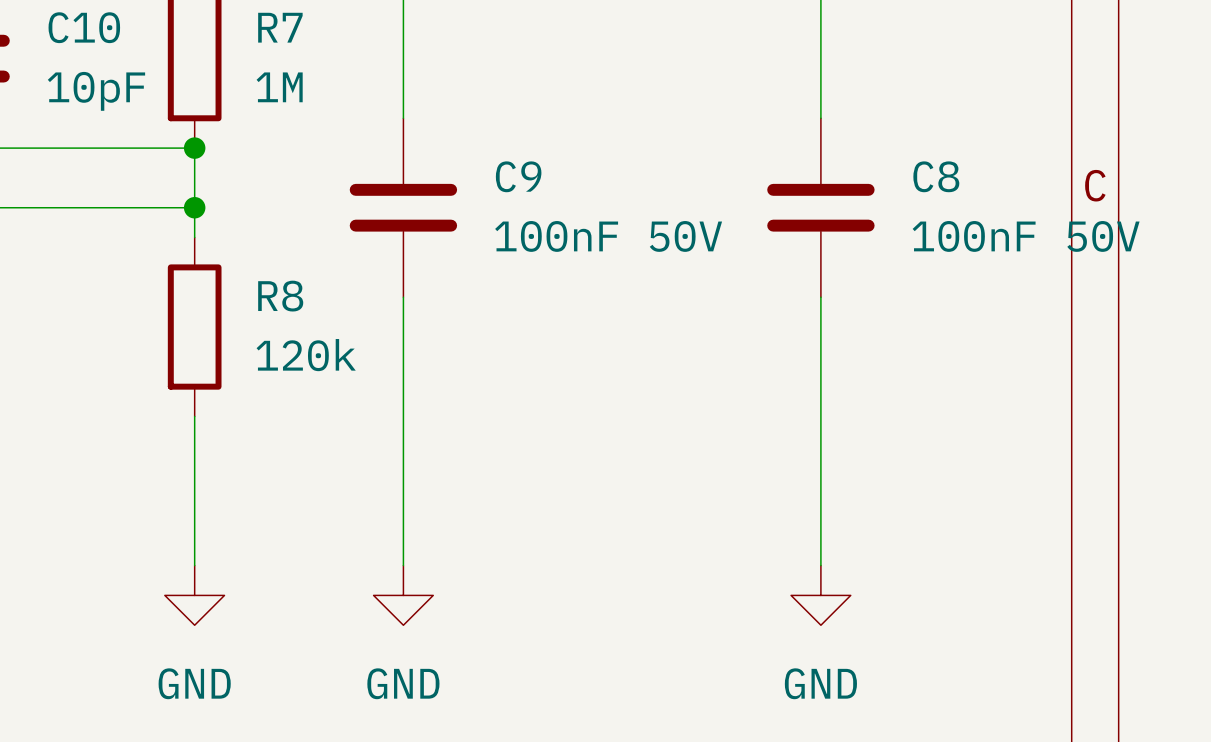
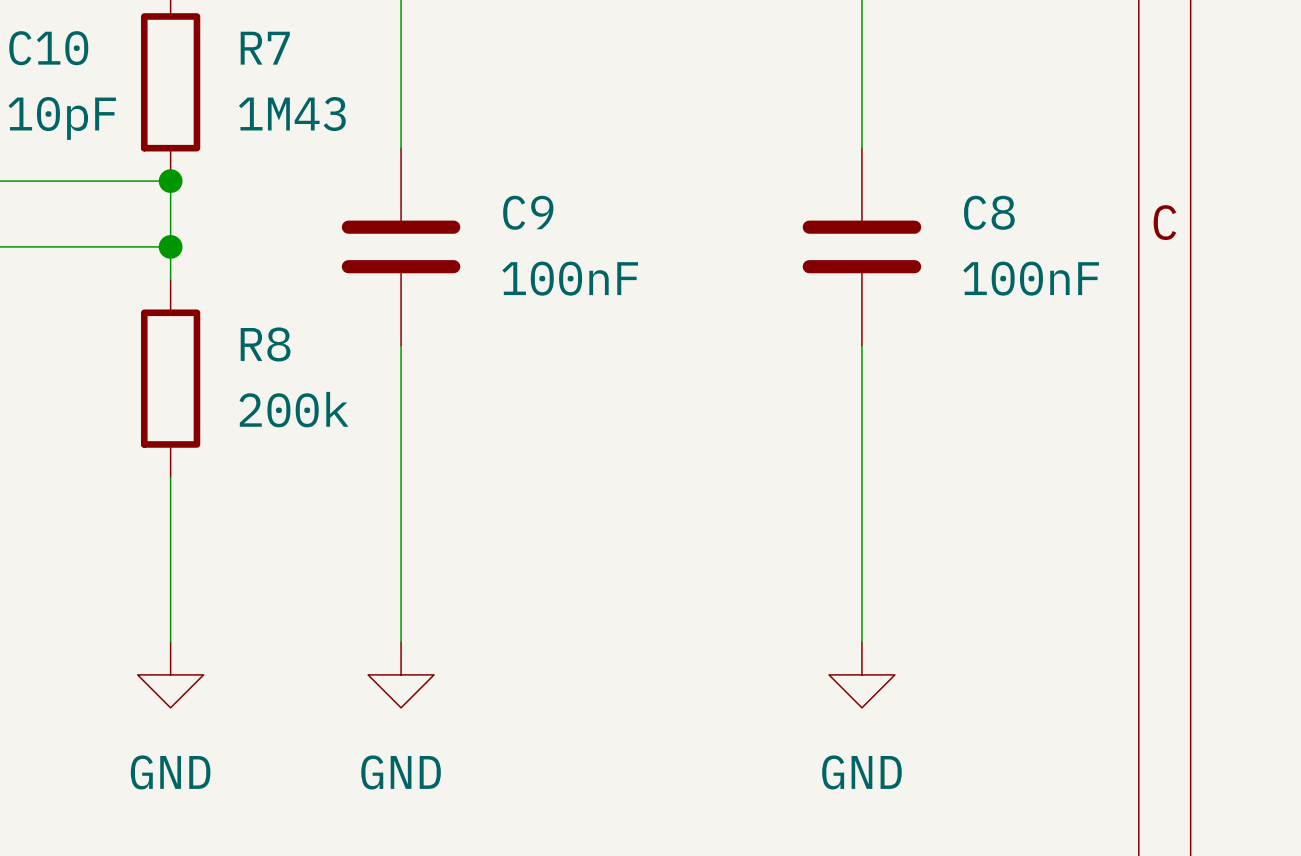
R7 value: 1M (279, 87) -> 1M43 (292, 114)
C9 value: 100nF 50V (608, 236) -> 100nF (570, 278)
C8 value: 100nF 50V (1026, 236) -> 100nF (1031, 278)
R8 value: 120k (306, 355) -> 200k (293, 409)

